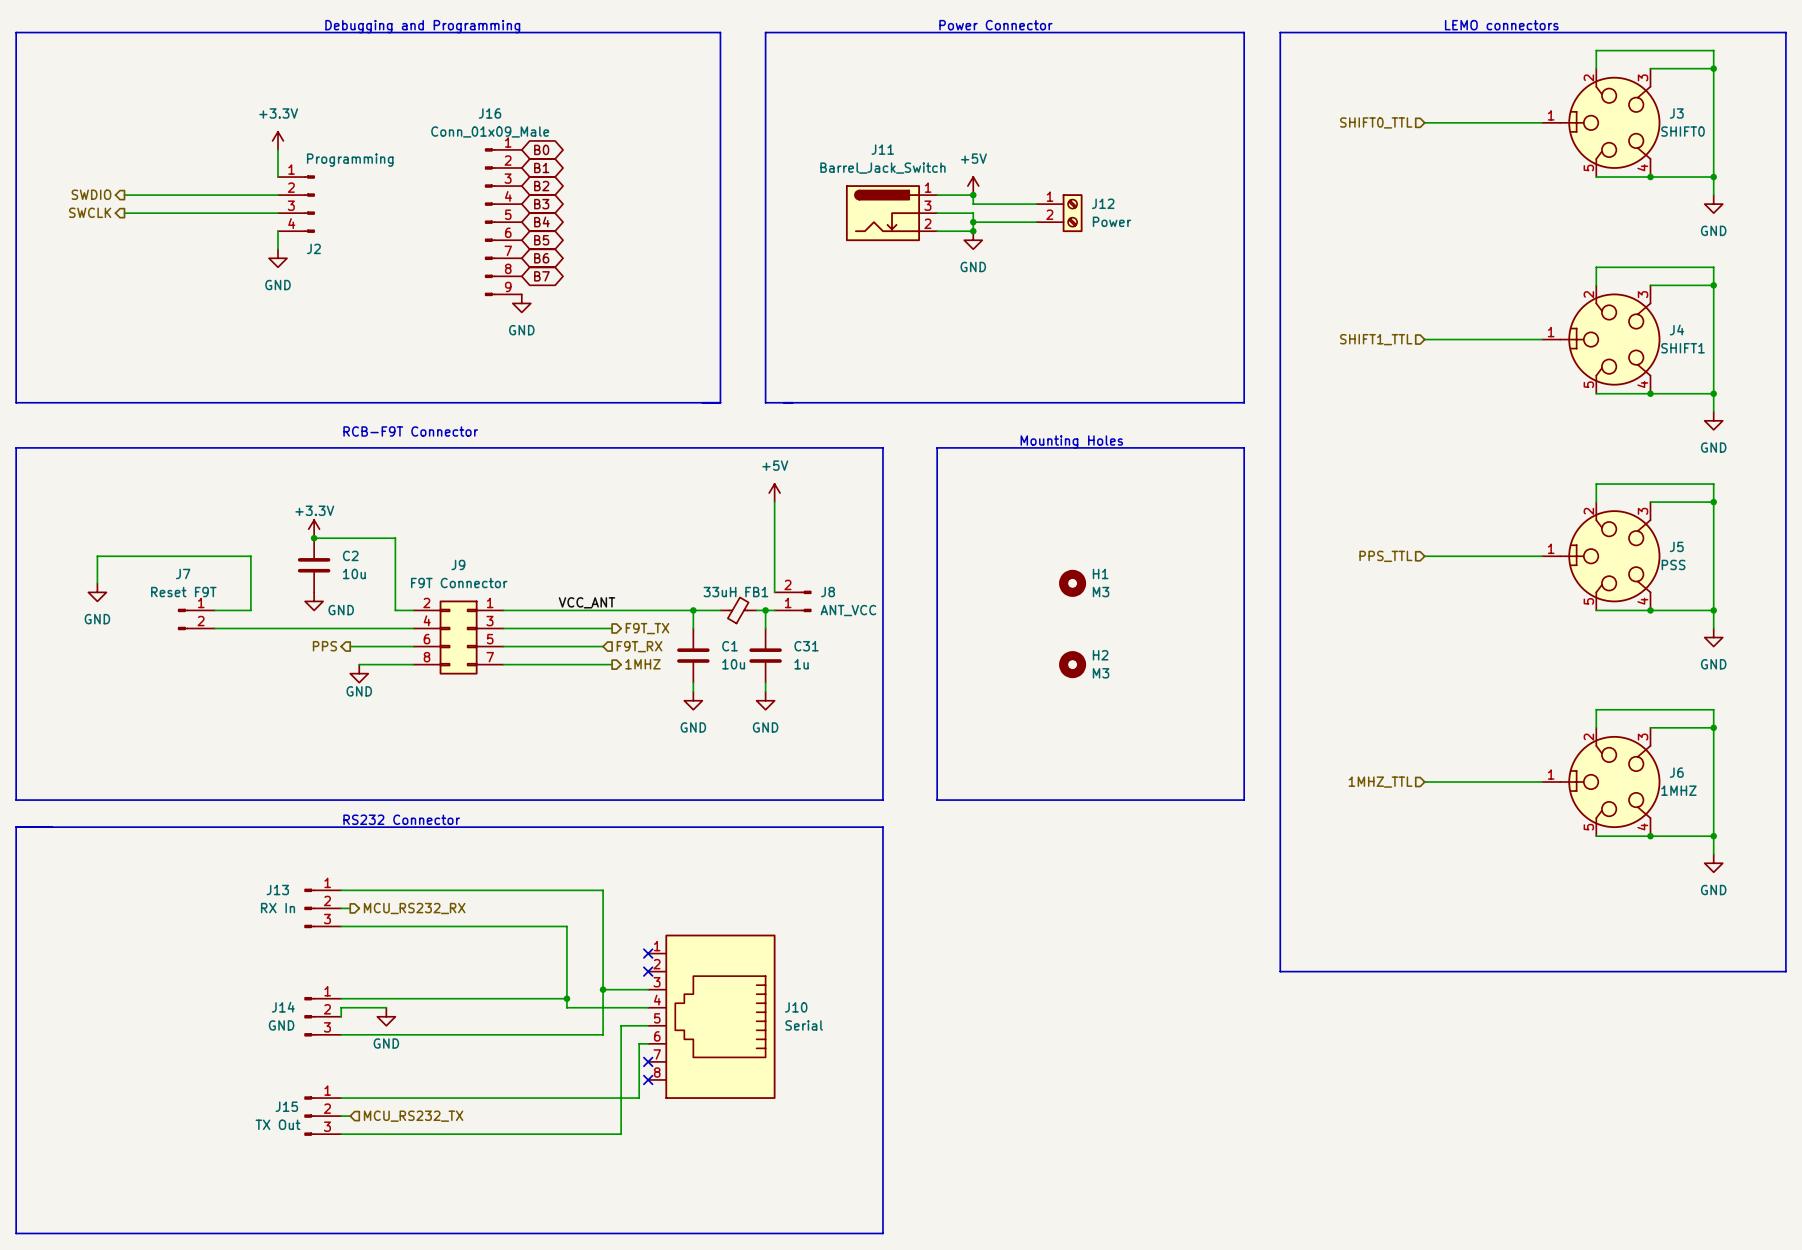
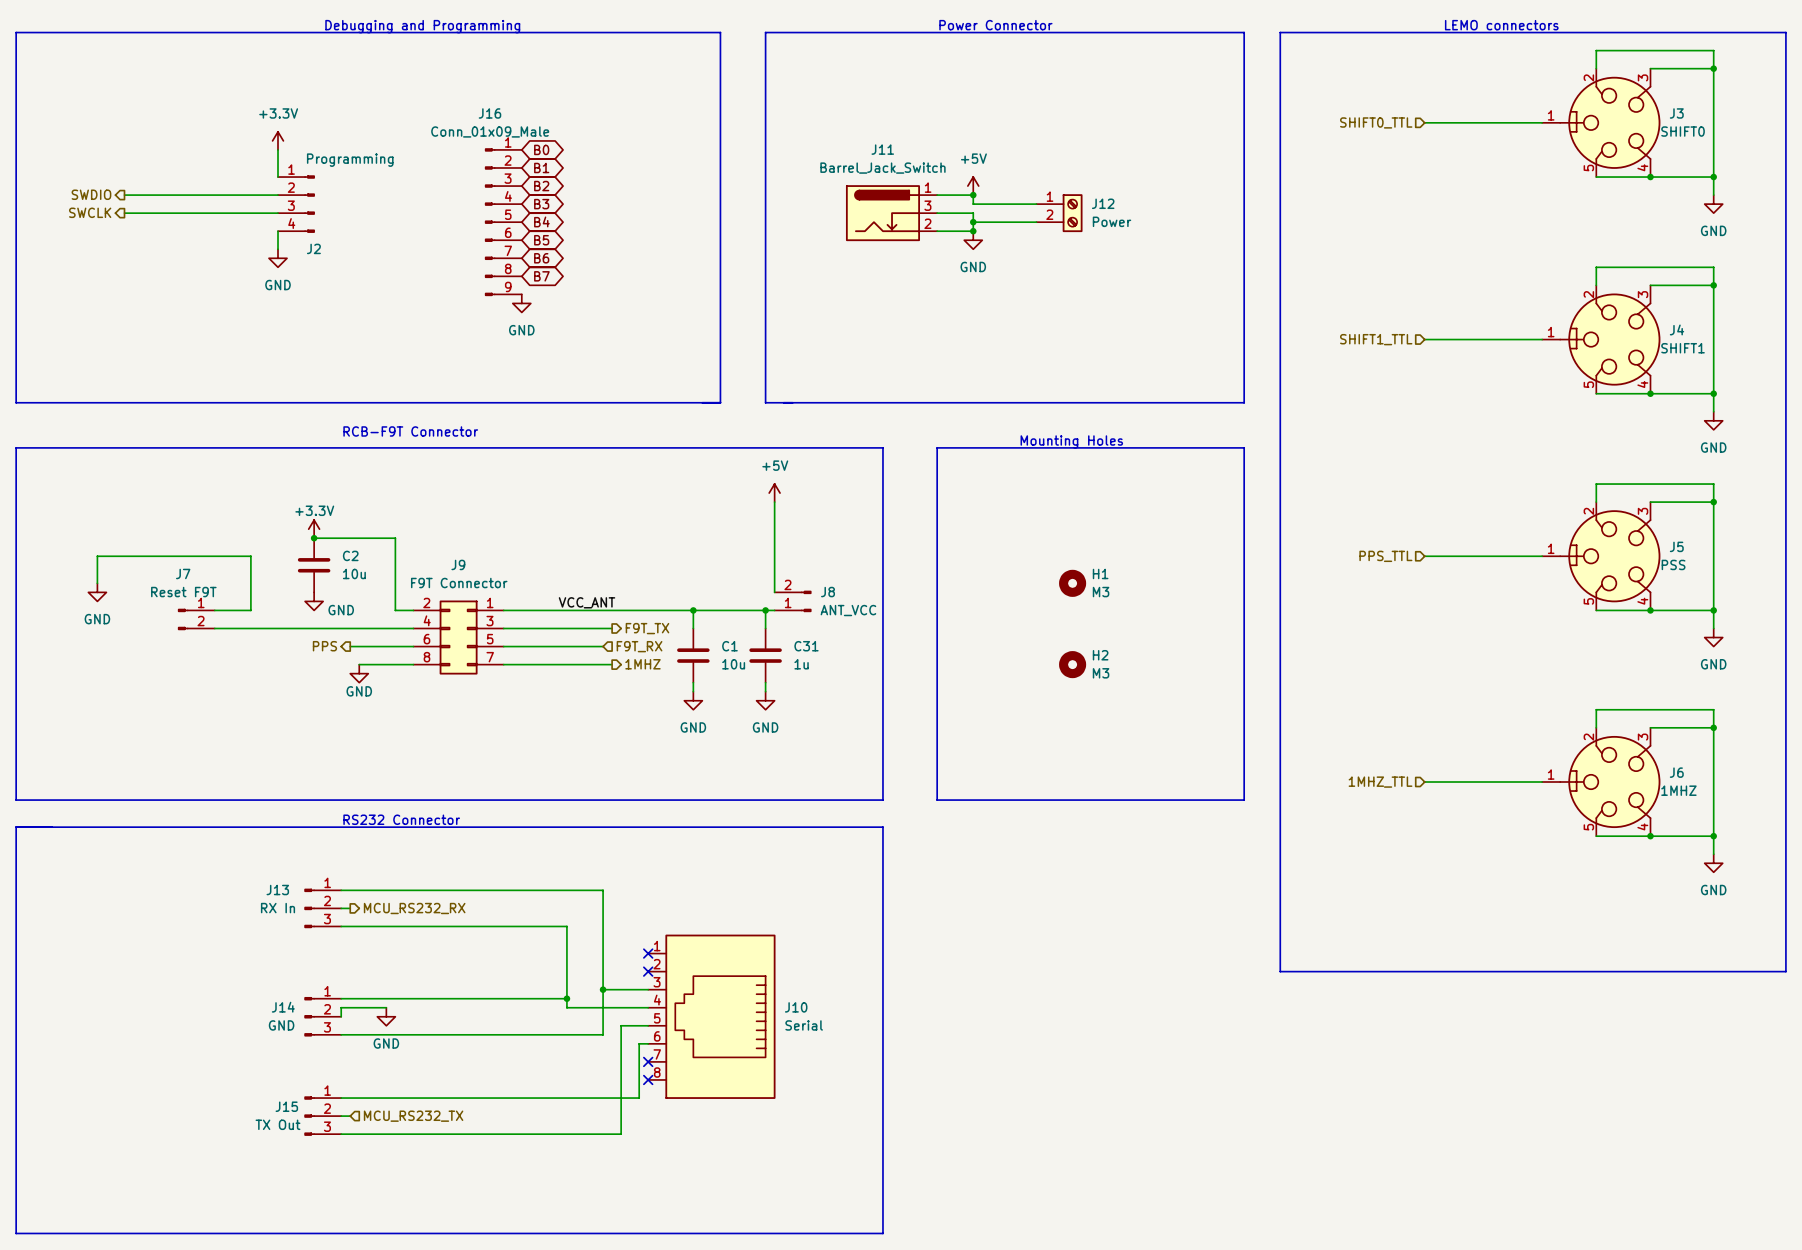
FB1: 33uH (738, 610) -> none

